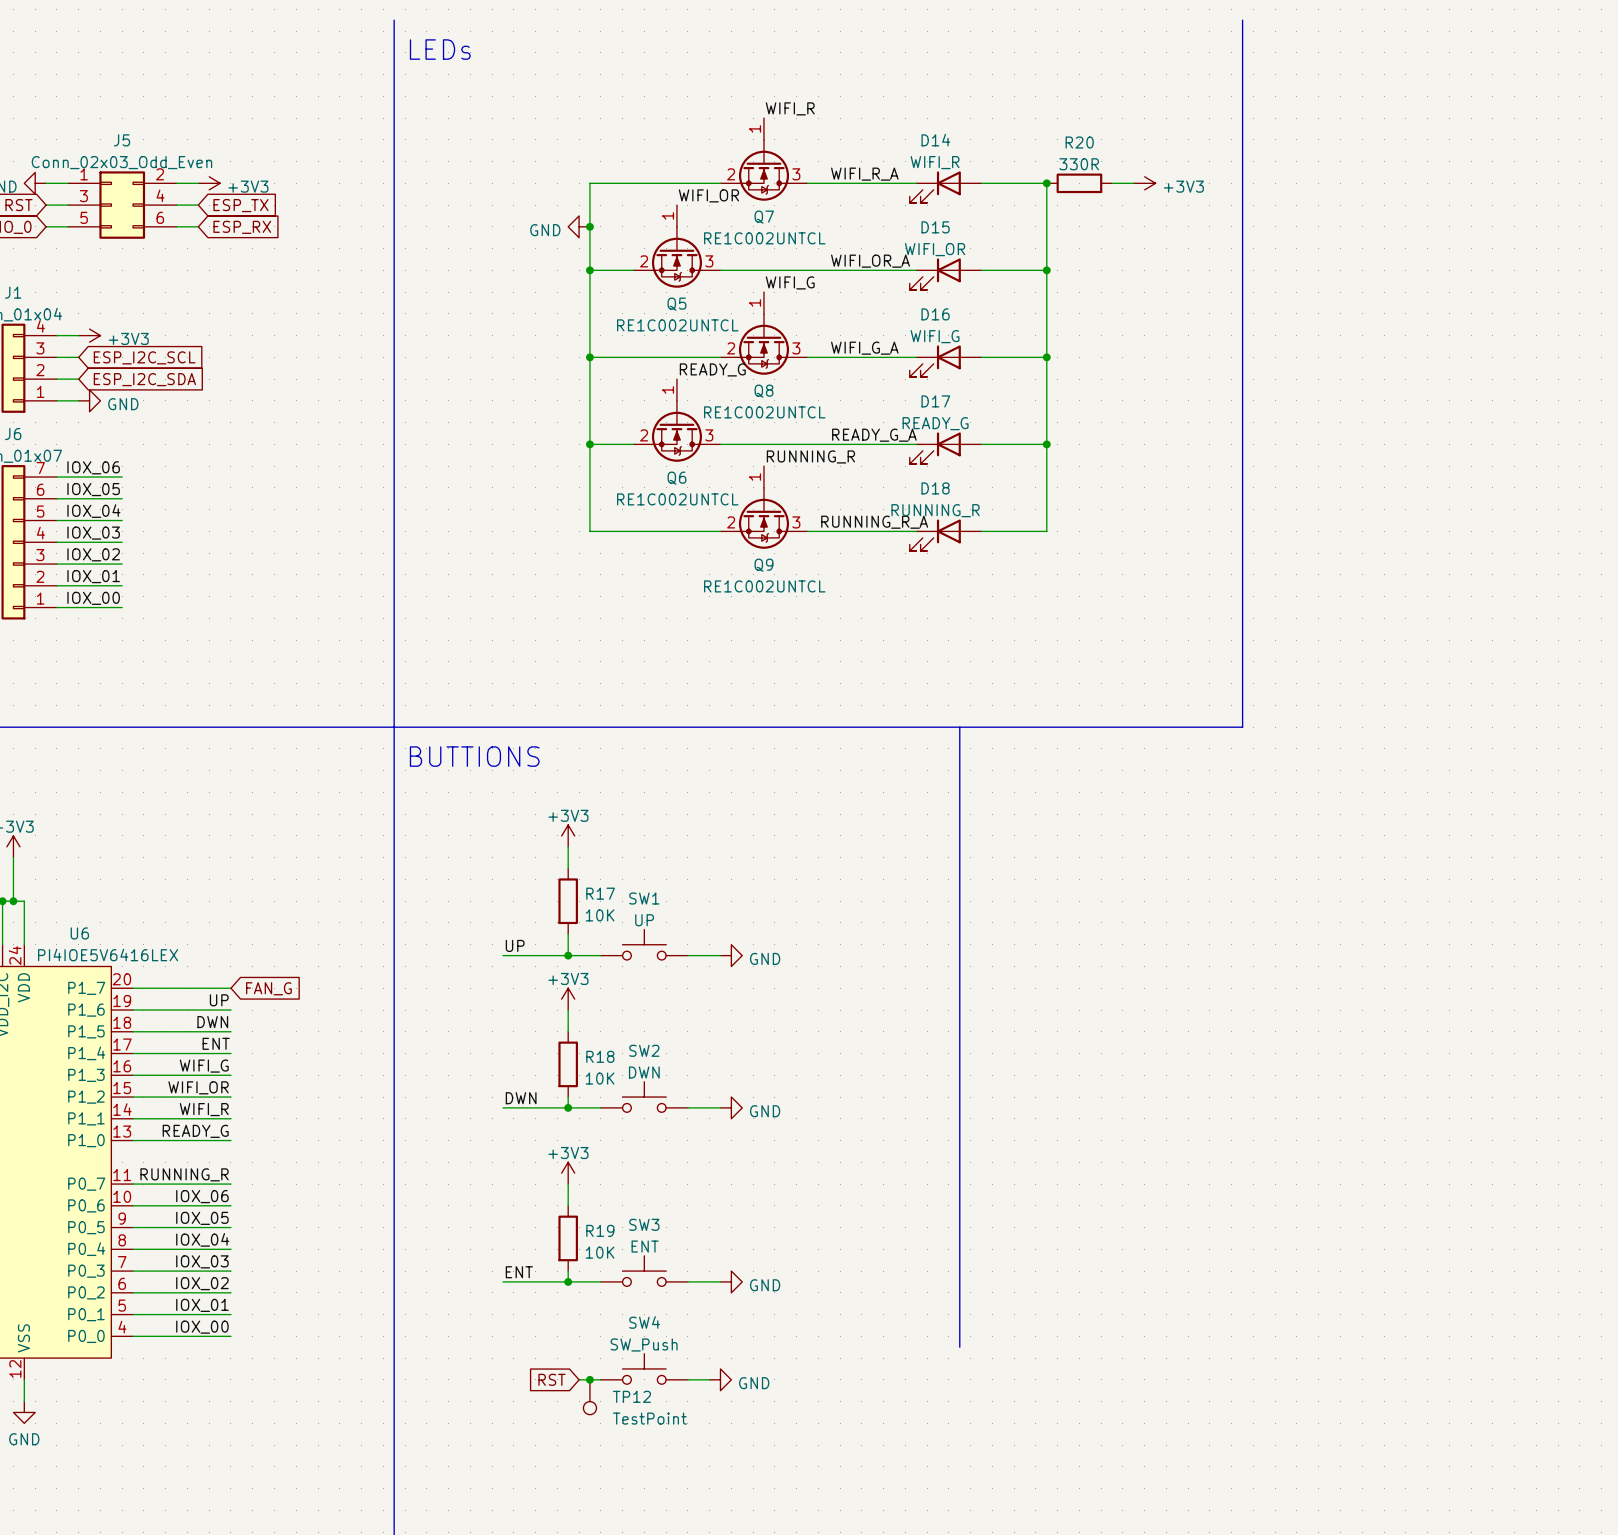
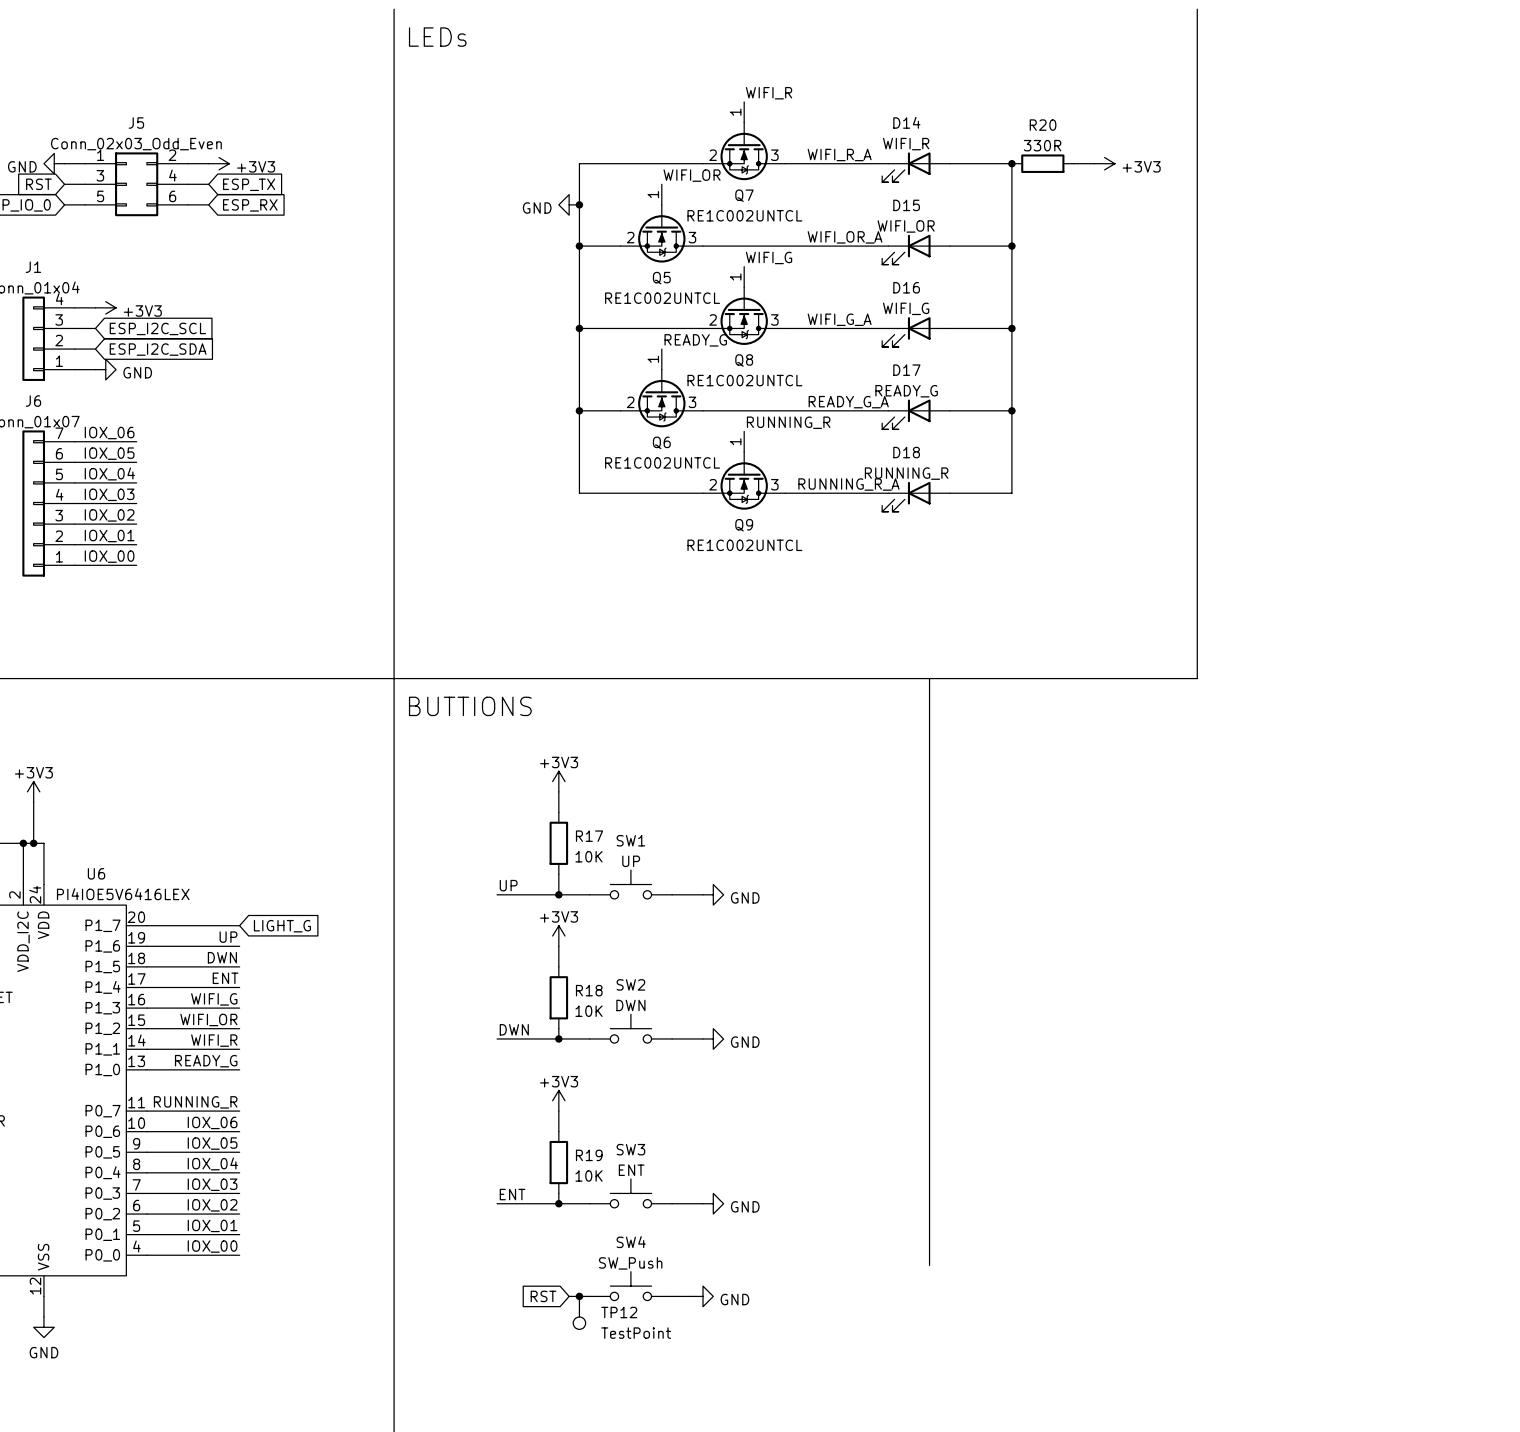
global label: FAN_G (268, 988) -> LIGHT_G (282, 926)

